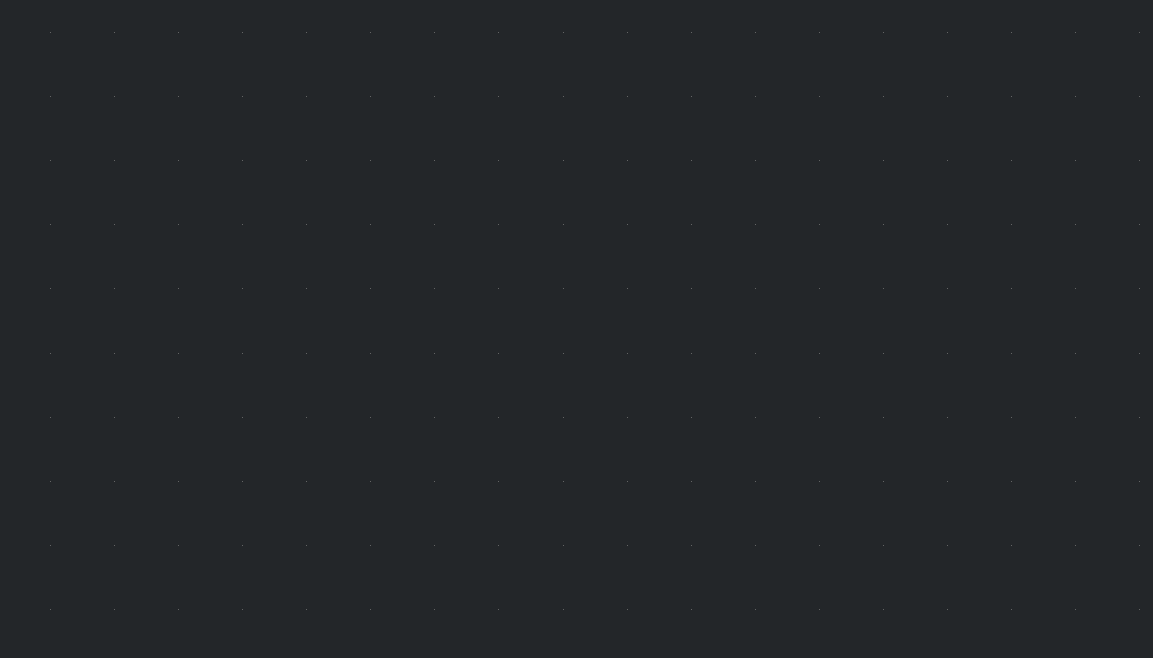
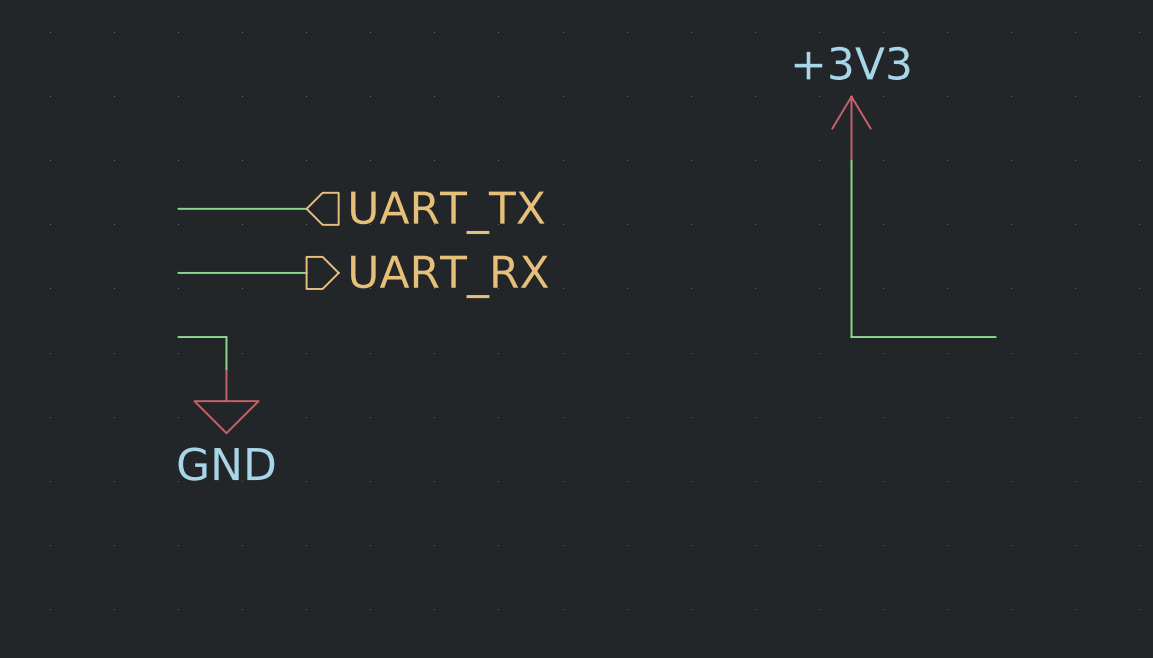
power symbol: none -> +3V3 (851, 128)
wire: none -> (851, 160) (851, 337) (995, 337)
wire: none -> (178, 208) (306, 208)
hierarchical label: none -> UART_TX (447, 212)
wire: none -> (178, 272) (306, 272)
hierarchical label: none -> UART_RX (449, 276)
wire: none -> (178, 337) (226, 337) (226, 369)
power symbol: none -> GND (226, 401)

